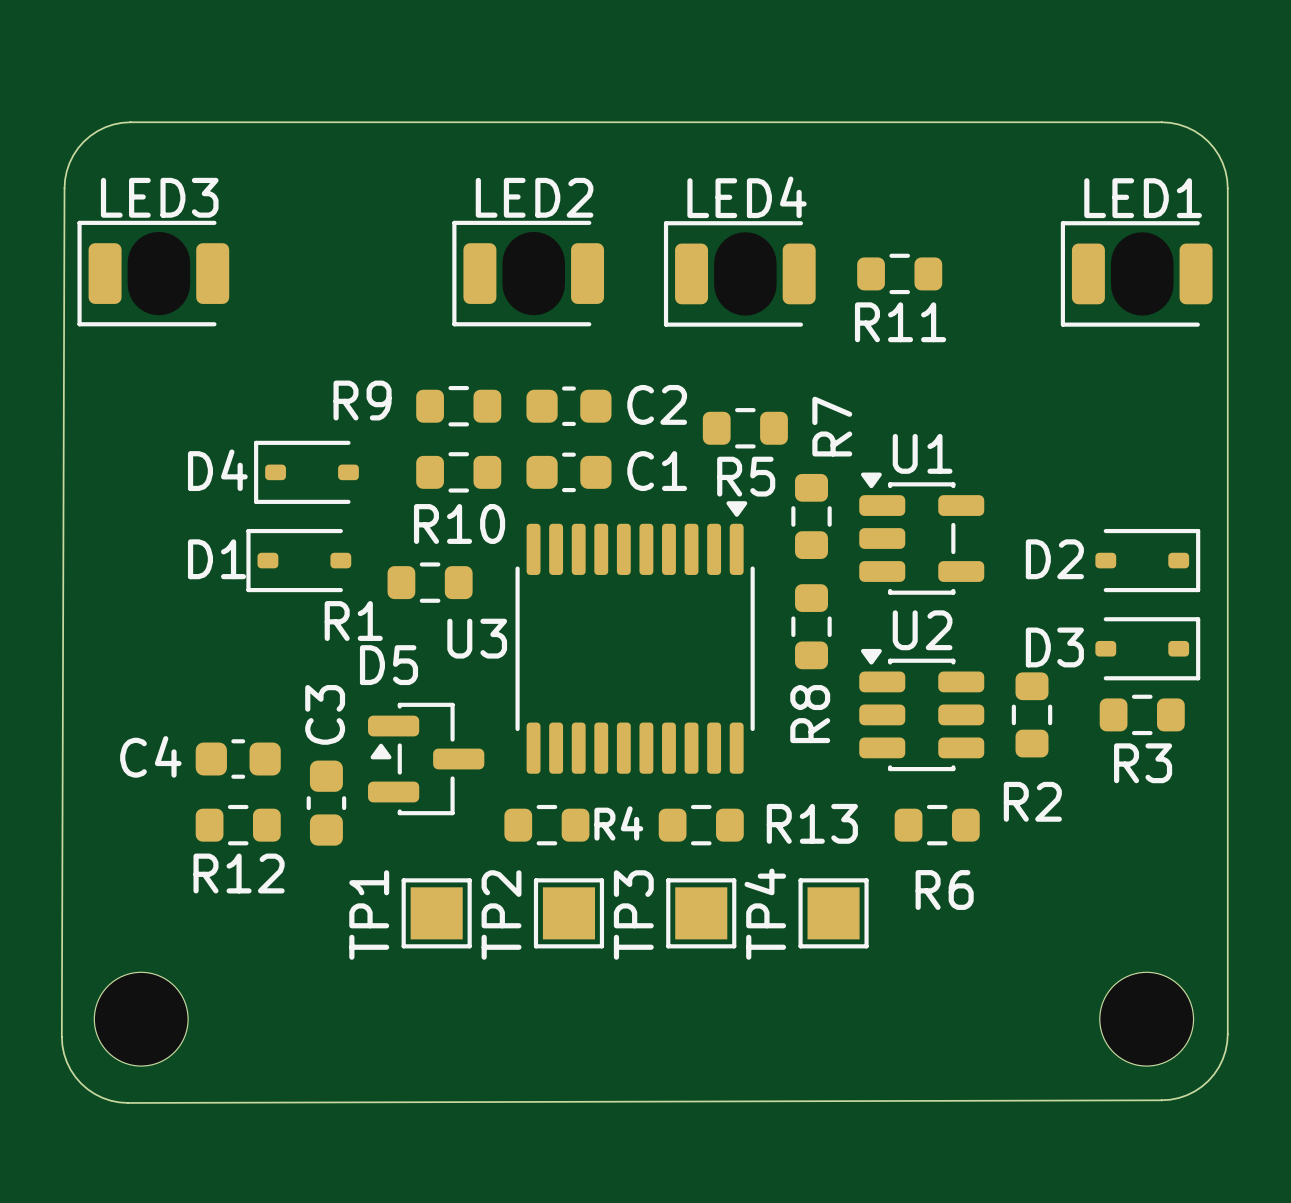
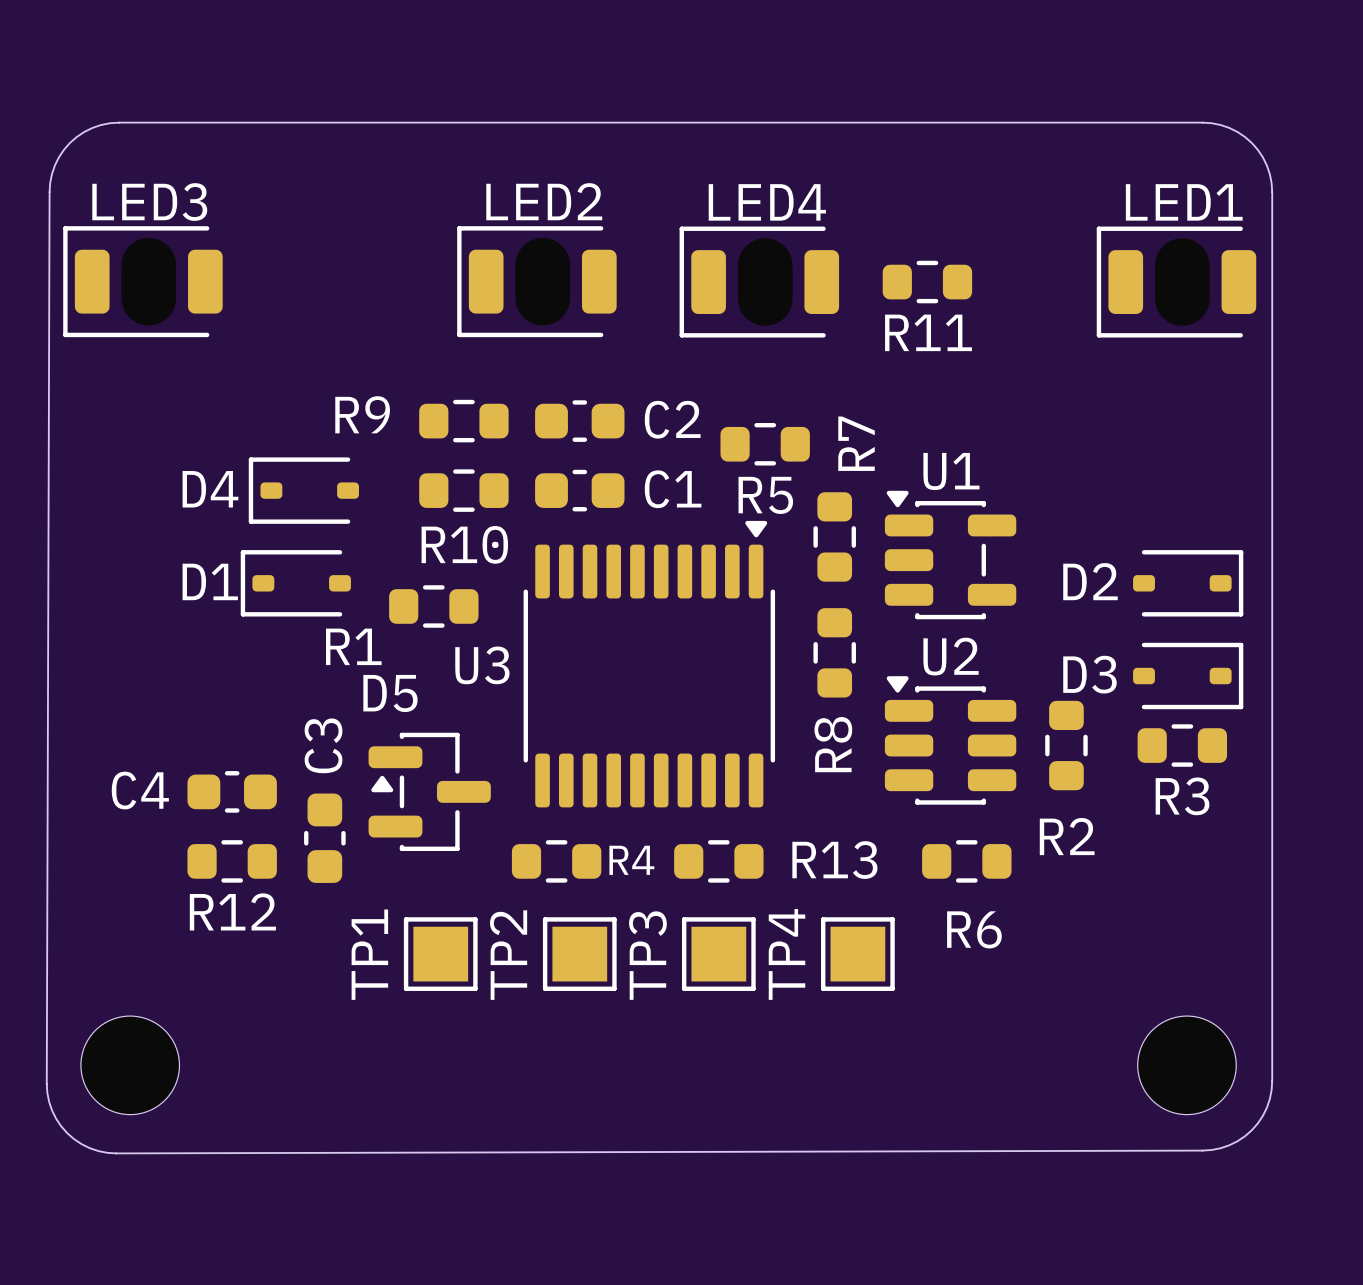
LED3 footprint: [77, 220, 230, 327] -> [63, 226, 223, 338]
LED2 footprint: [452, 220, 605, 327] -> [457, 226, 617, 338]
LED4 footprint: [663, 221, 816, 327] -> [679, 226, 840, 338]
LED1 footprint: [1060, 221, 1213, 327] -> [1096, 226, 1257, 338]

